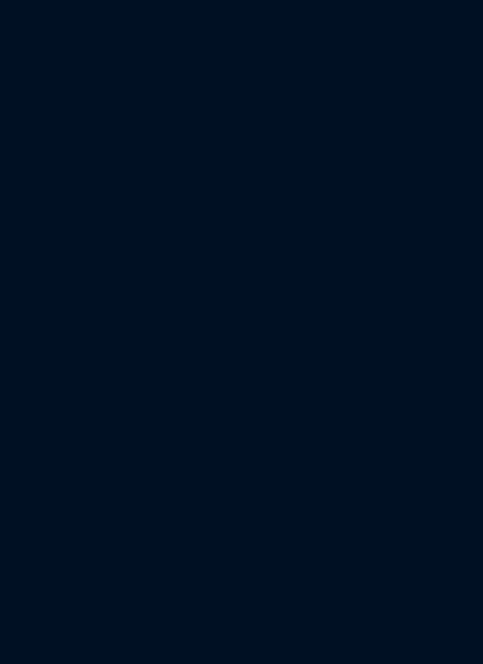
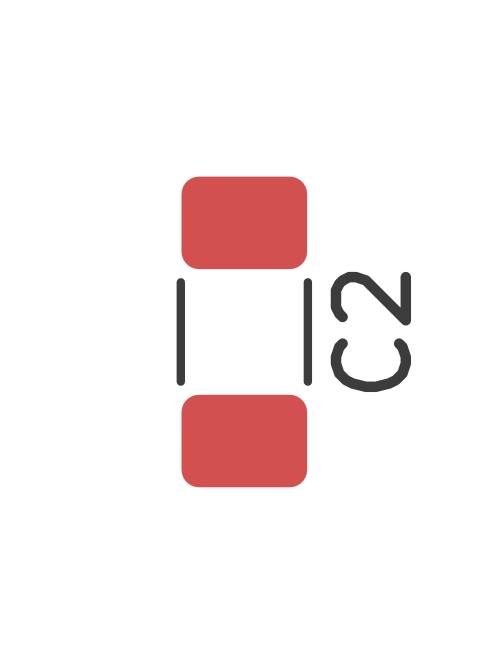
C2: none -> (244, 331)

